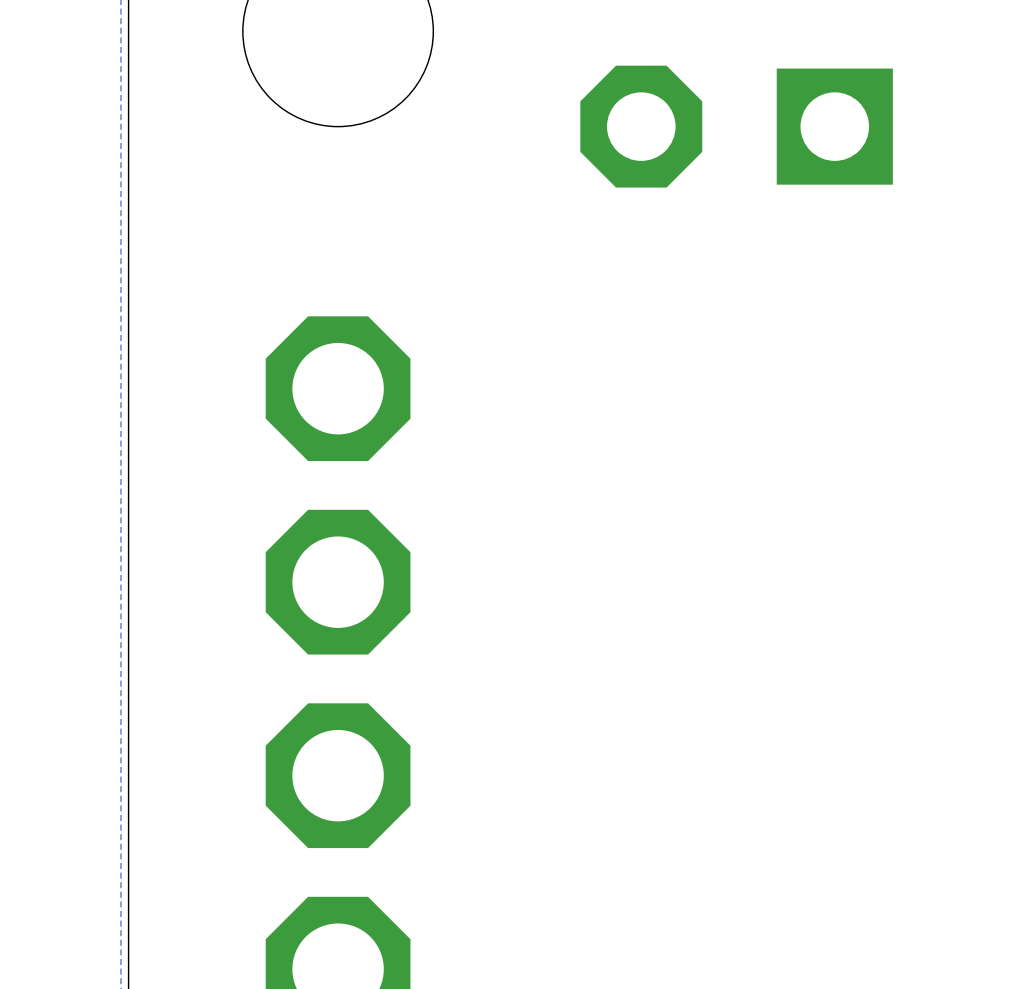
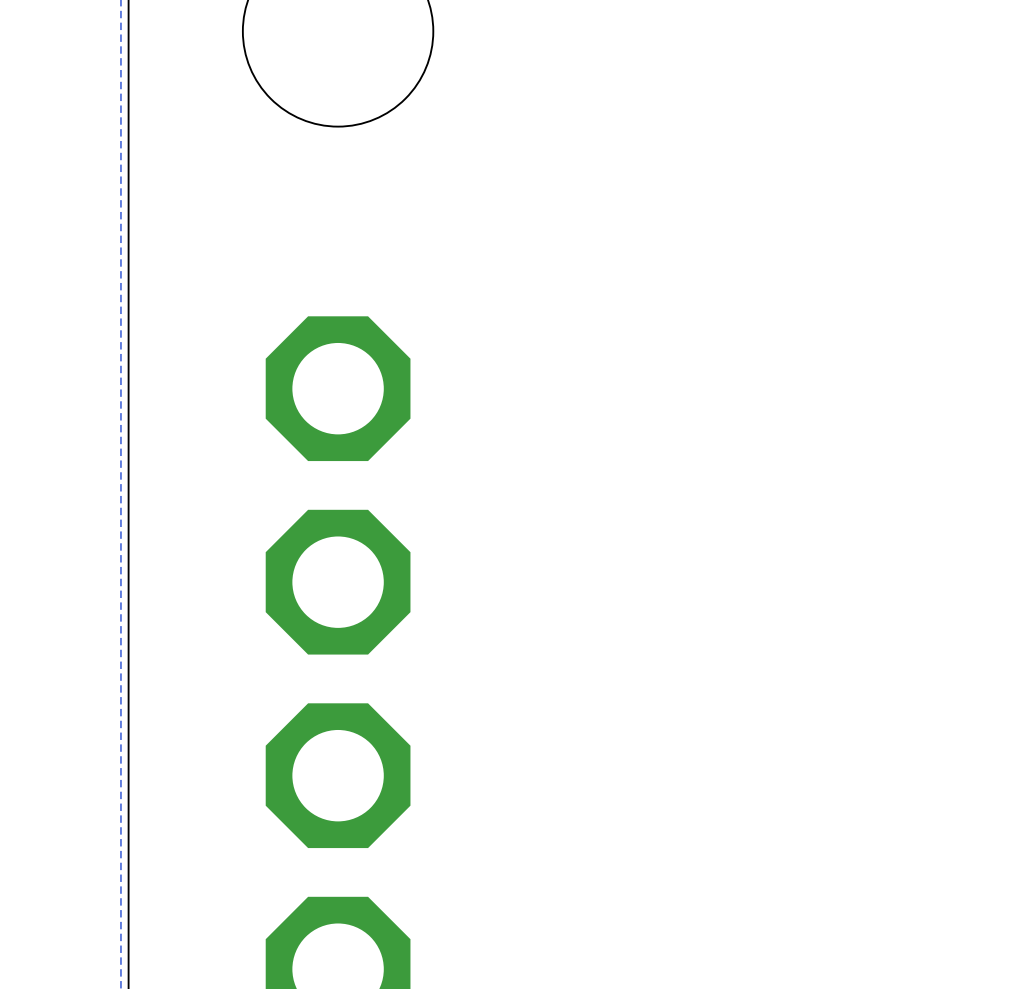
part: (736, 126) -> none

